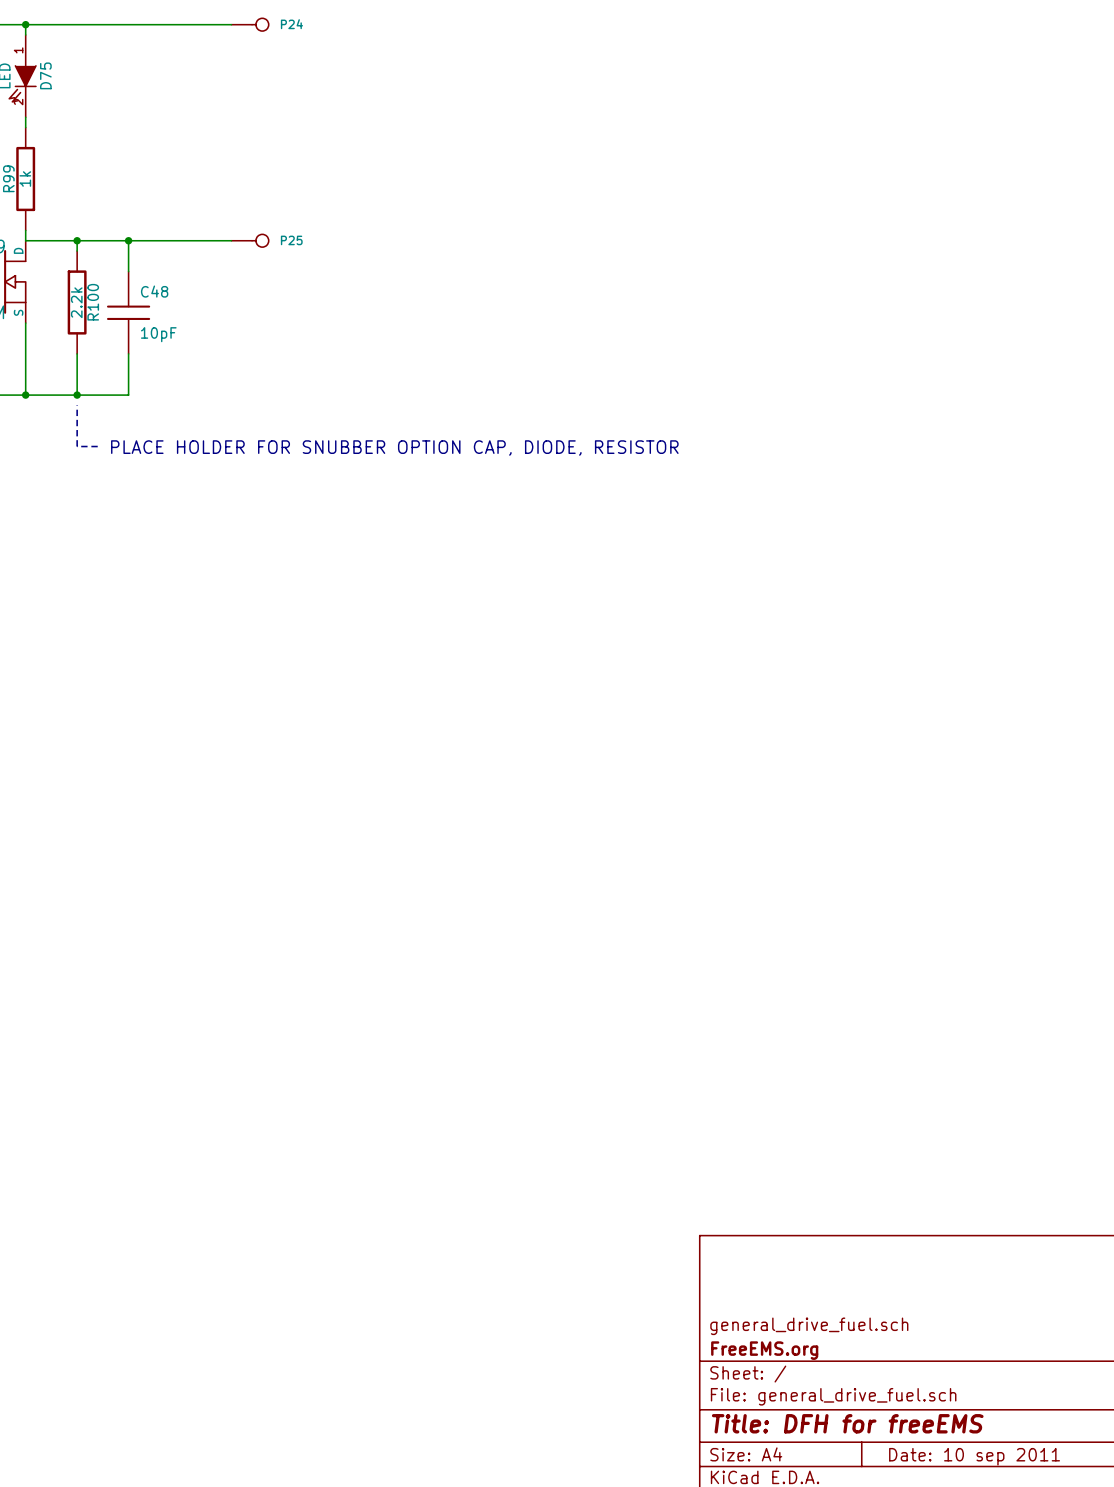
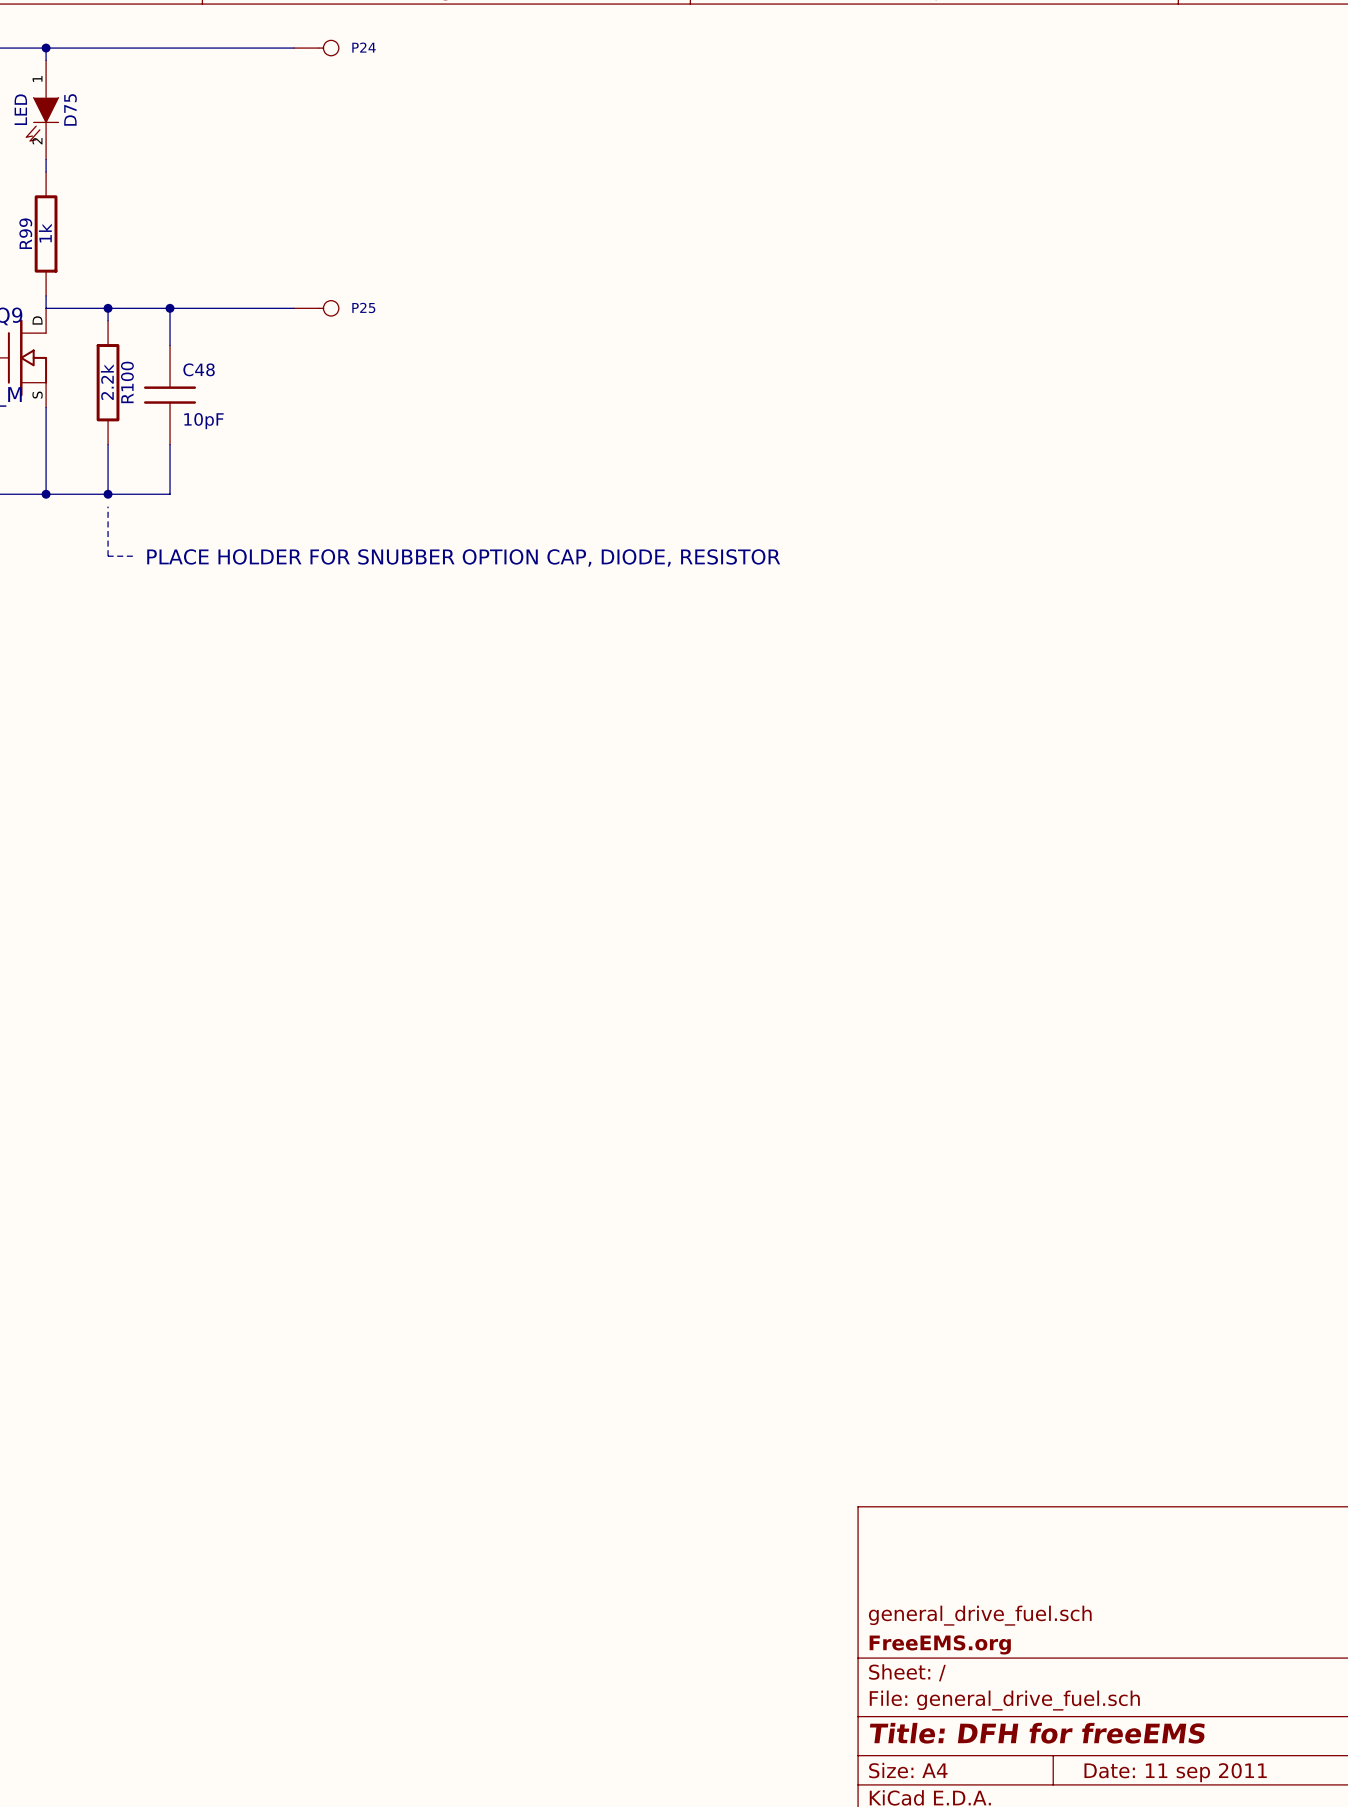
title block: Date: 10 sep 2011 (974, 1456) -> Date: 11 sep 2011 (1175, 1772)

